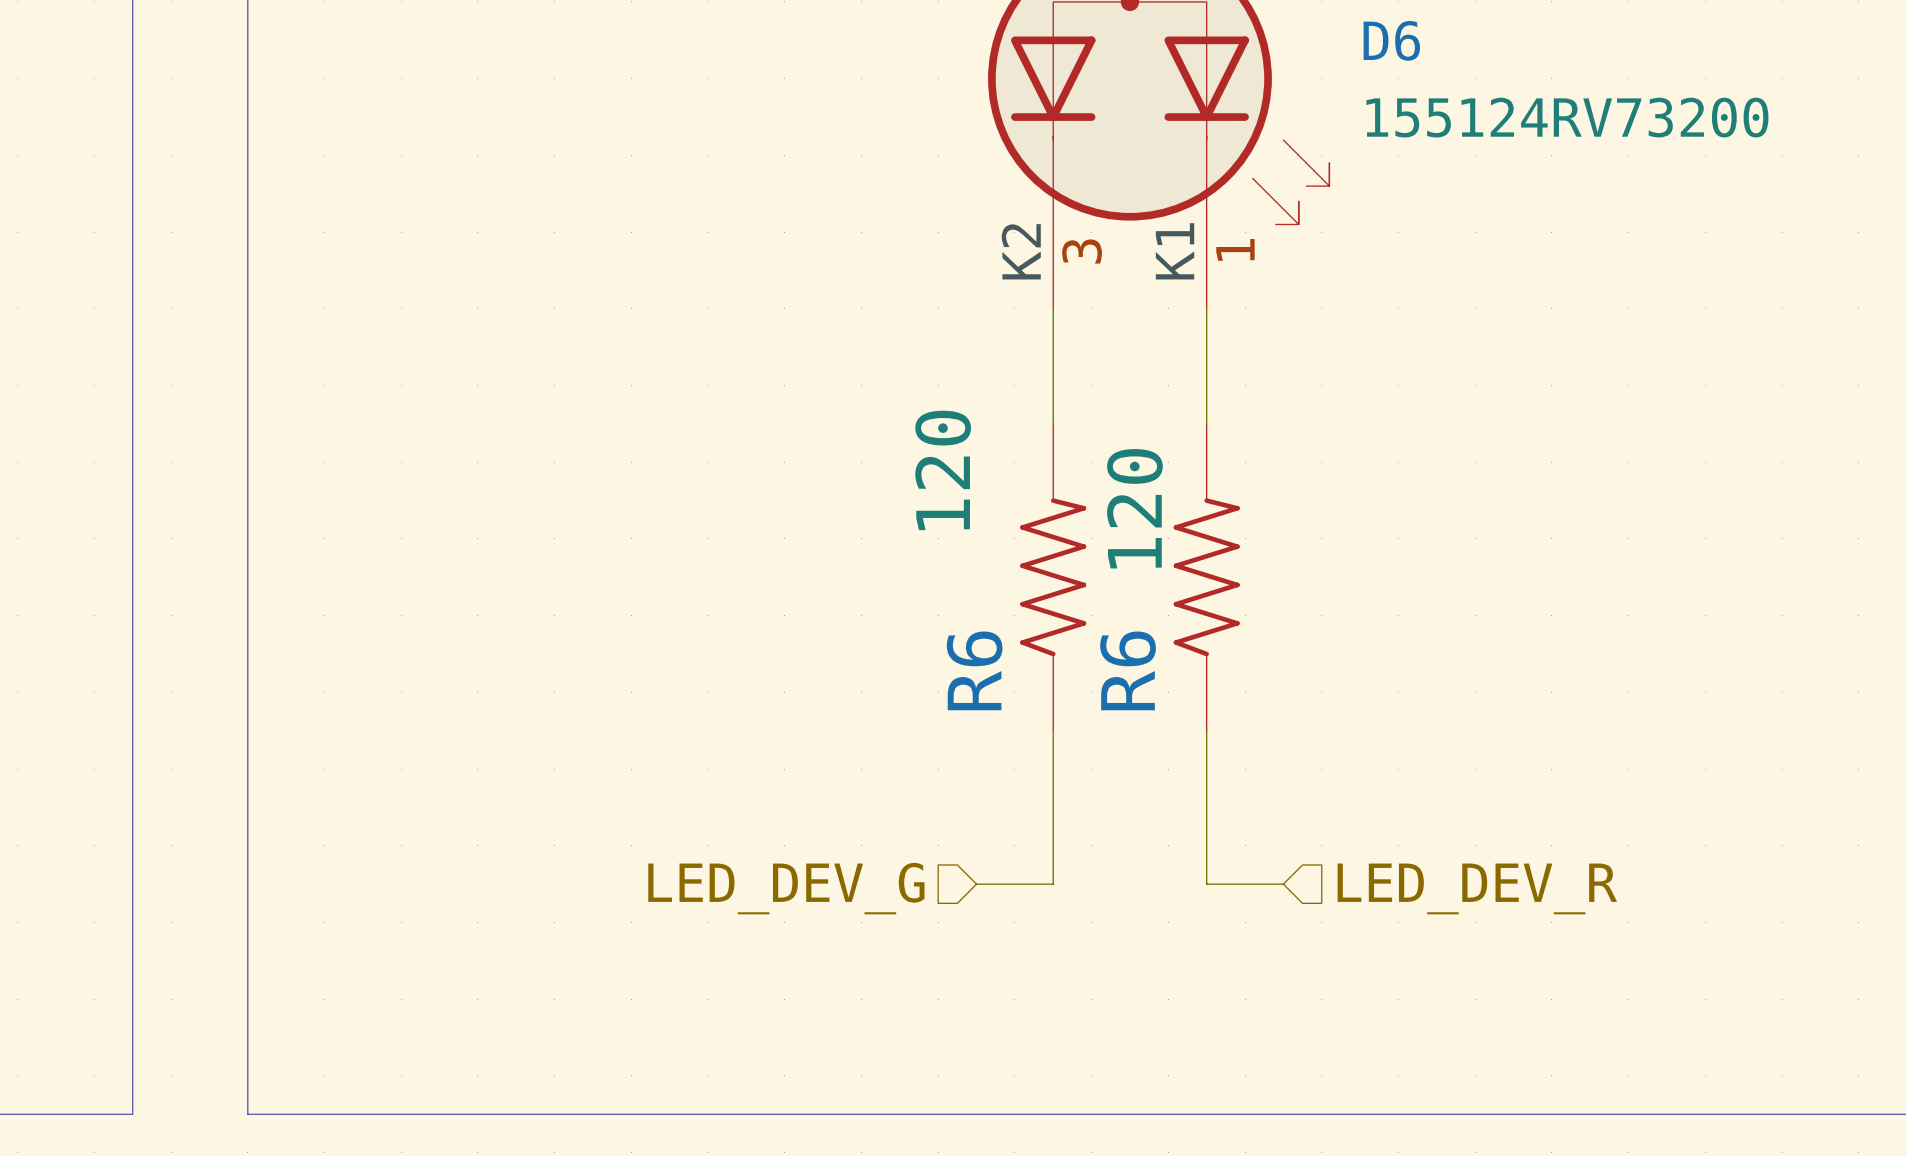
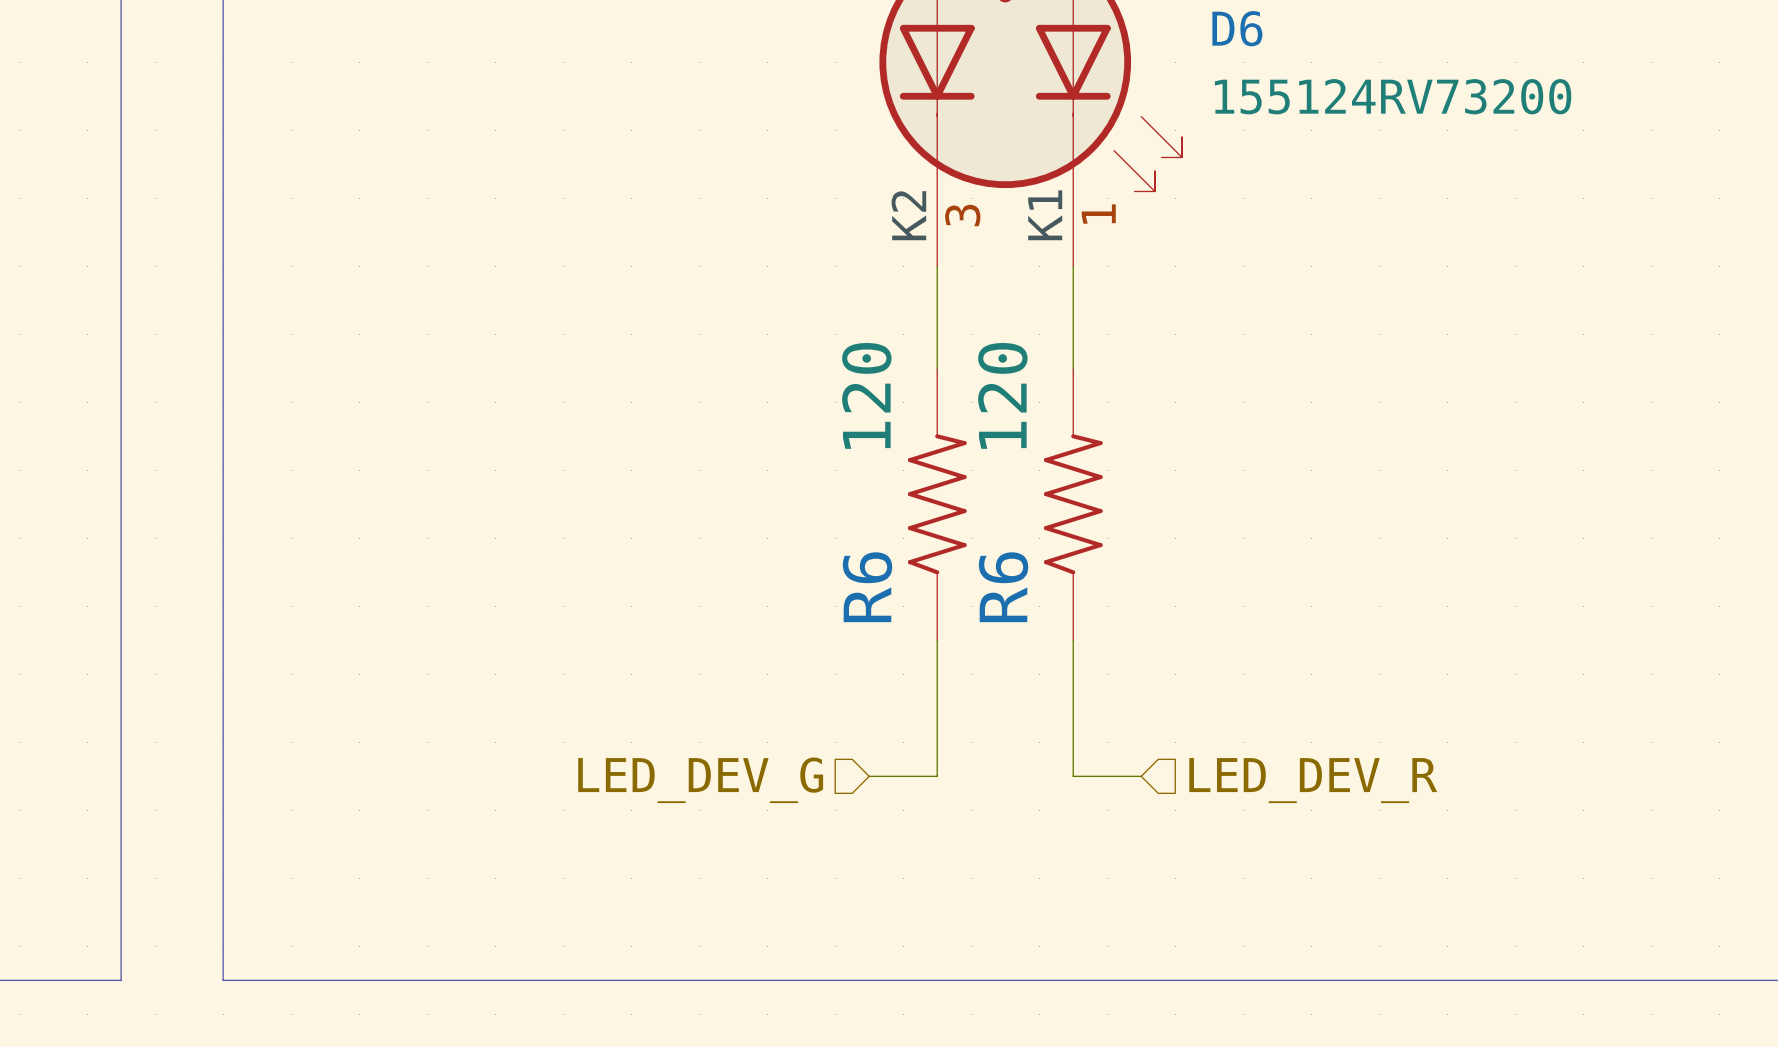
R6 value position: 120 (943, 470) -> 120 (866, 395)
R6 value position: 120 (1134, 508) -> 120 (1002, 395)

